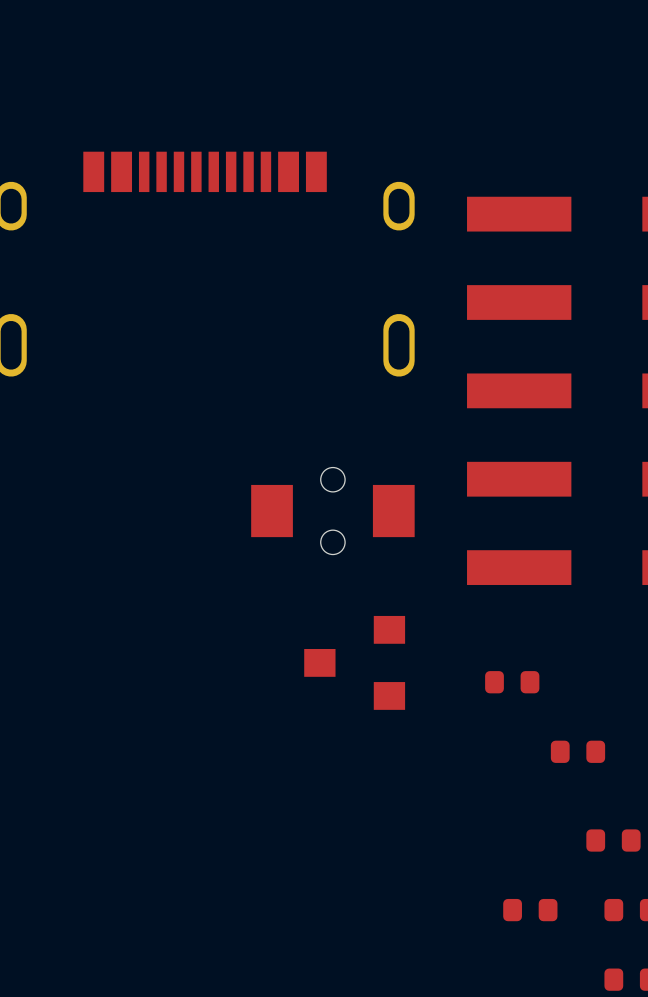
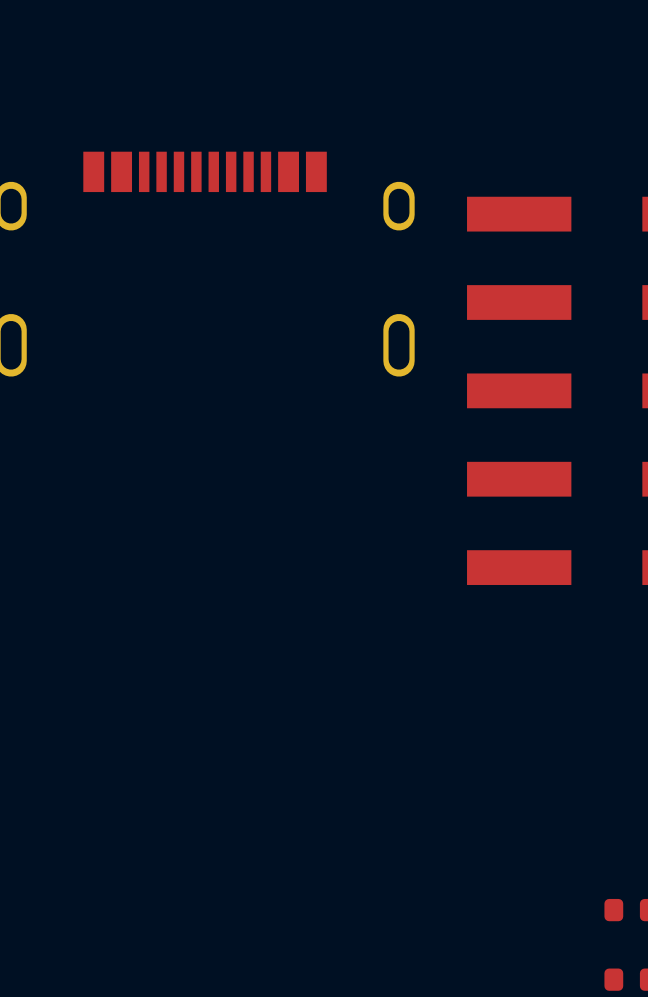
part: (332, 511) -> none
part: (354, 662) -> none
part: (512, 682) -> none
part: (577, 751) -> none
part: (613, 840) -> none
part: (530, 910) -> none

